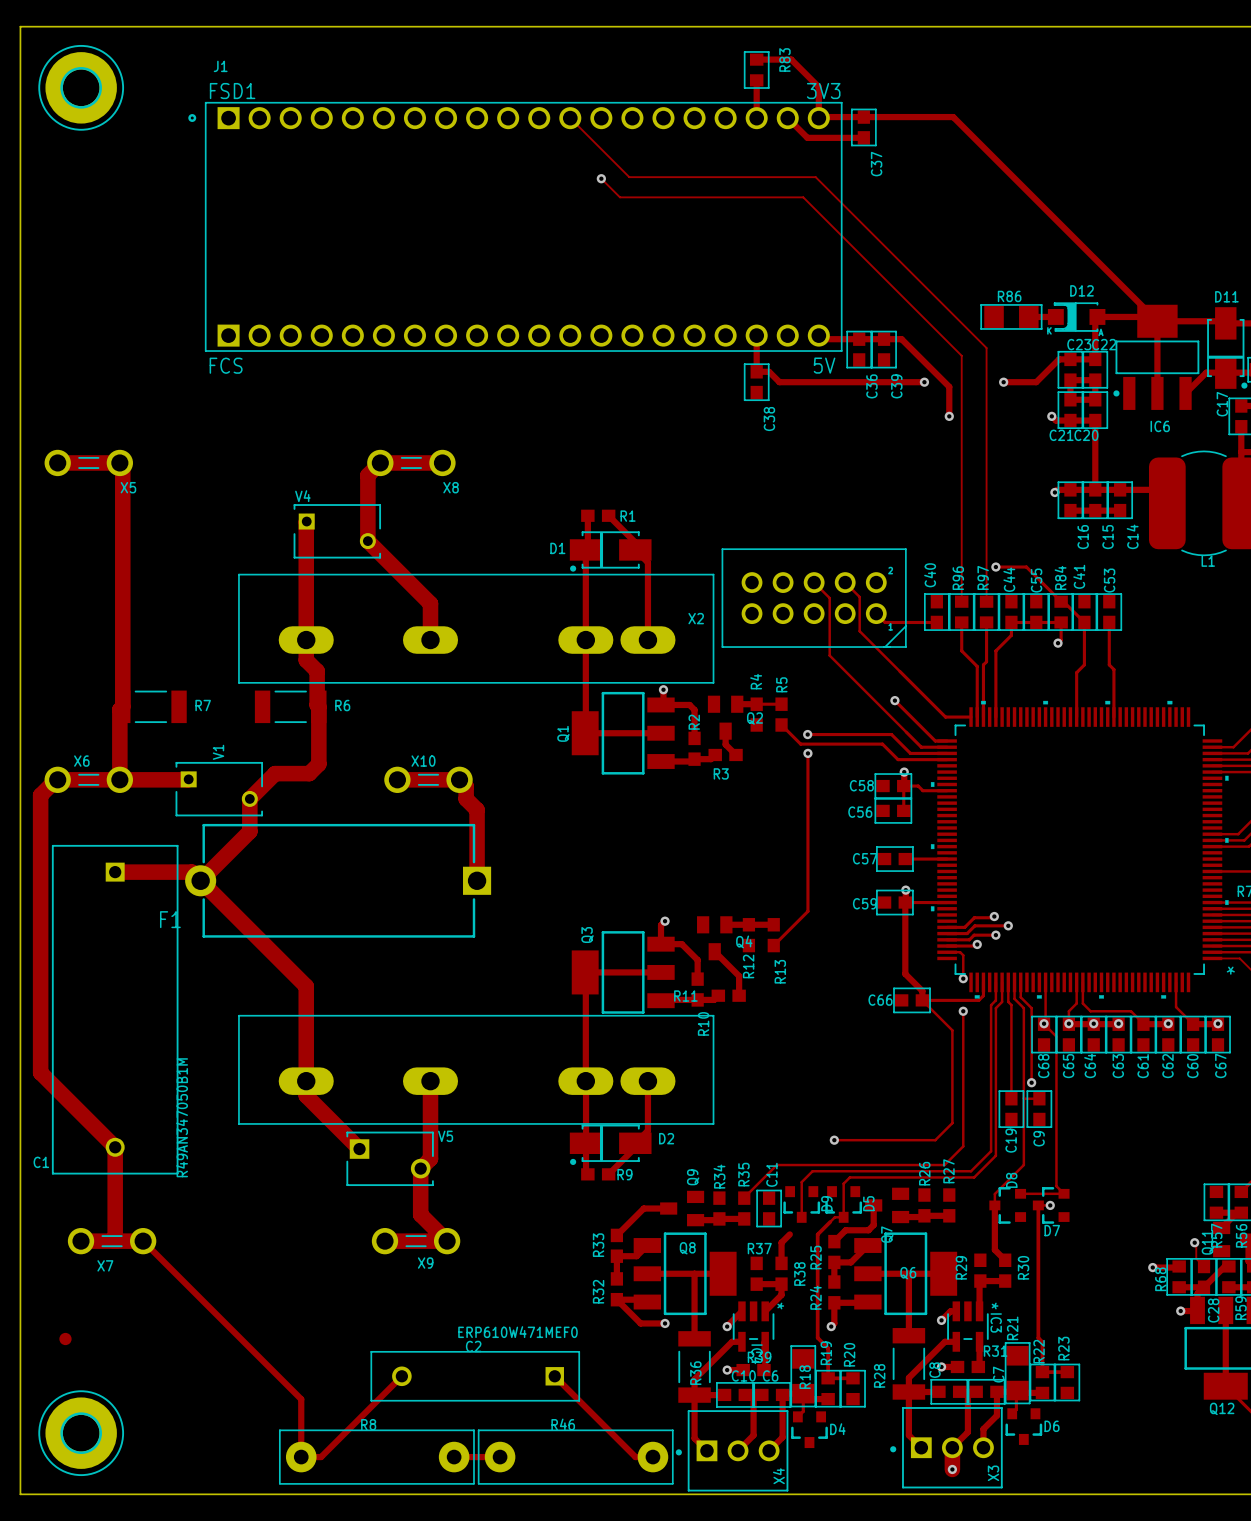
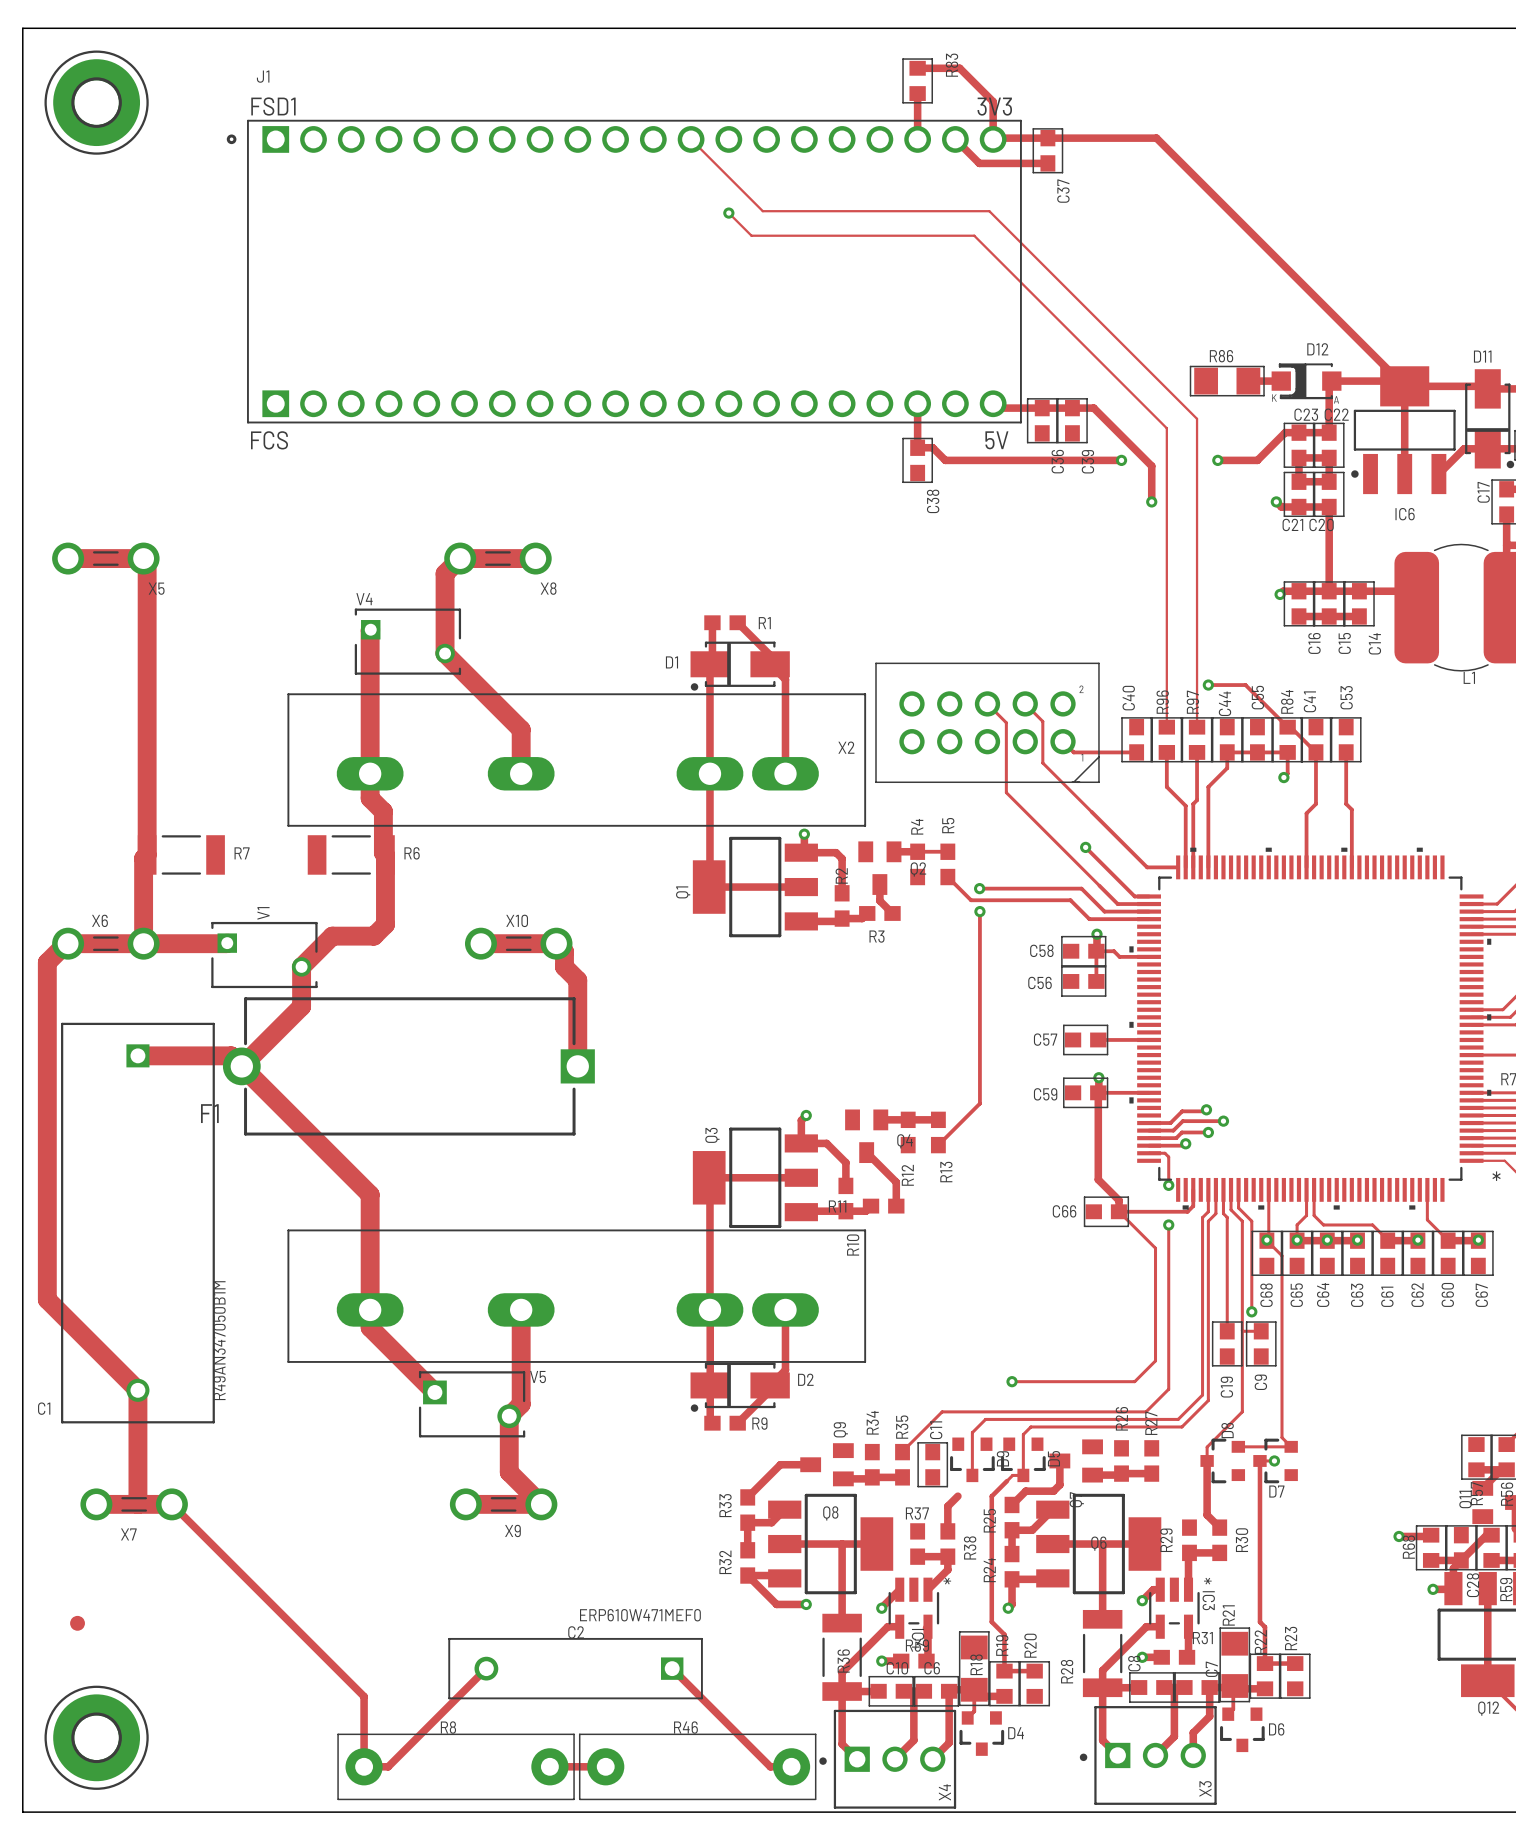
track: (1194, 1242) (1196, 1258) (1204, 1266) -> none
via: (1194, 1242) -> none
track: (952, 1447) (952, 1469) -> none
via: (952, 1469) -> none

